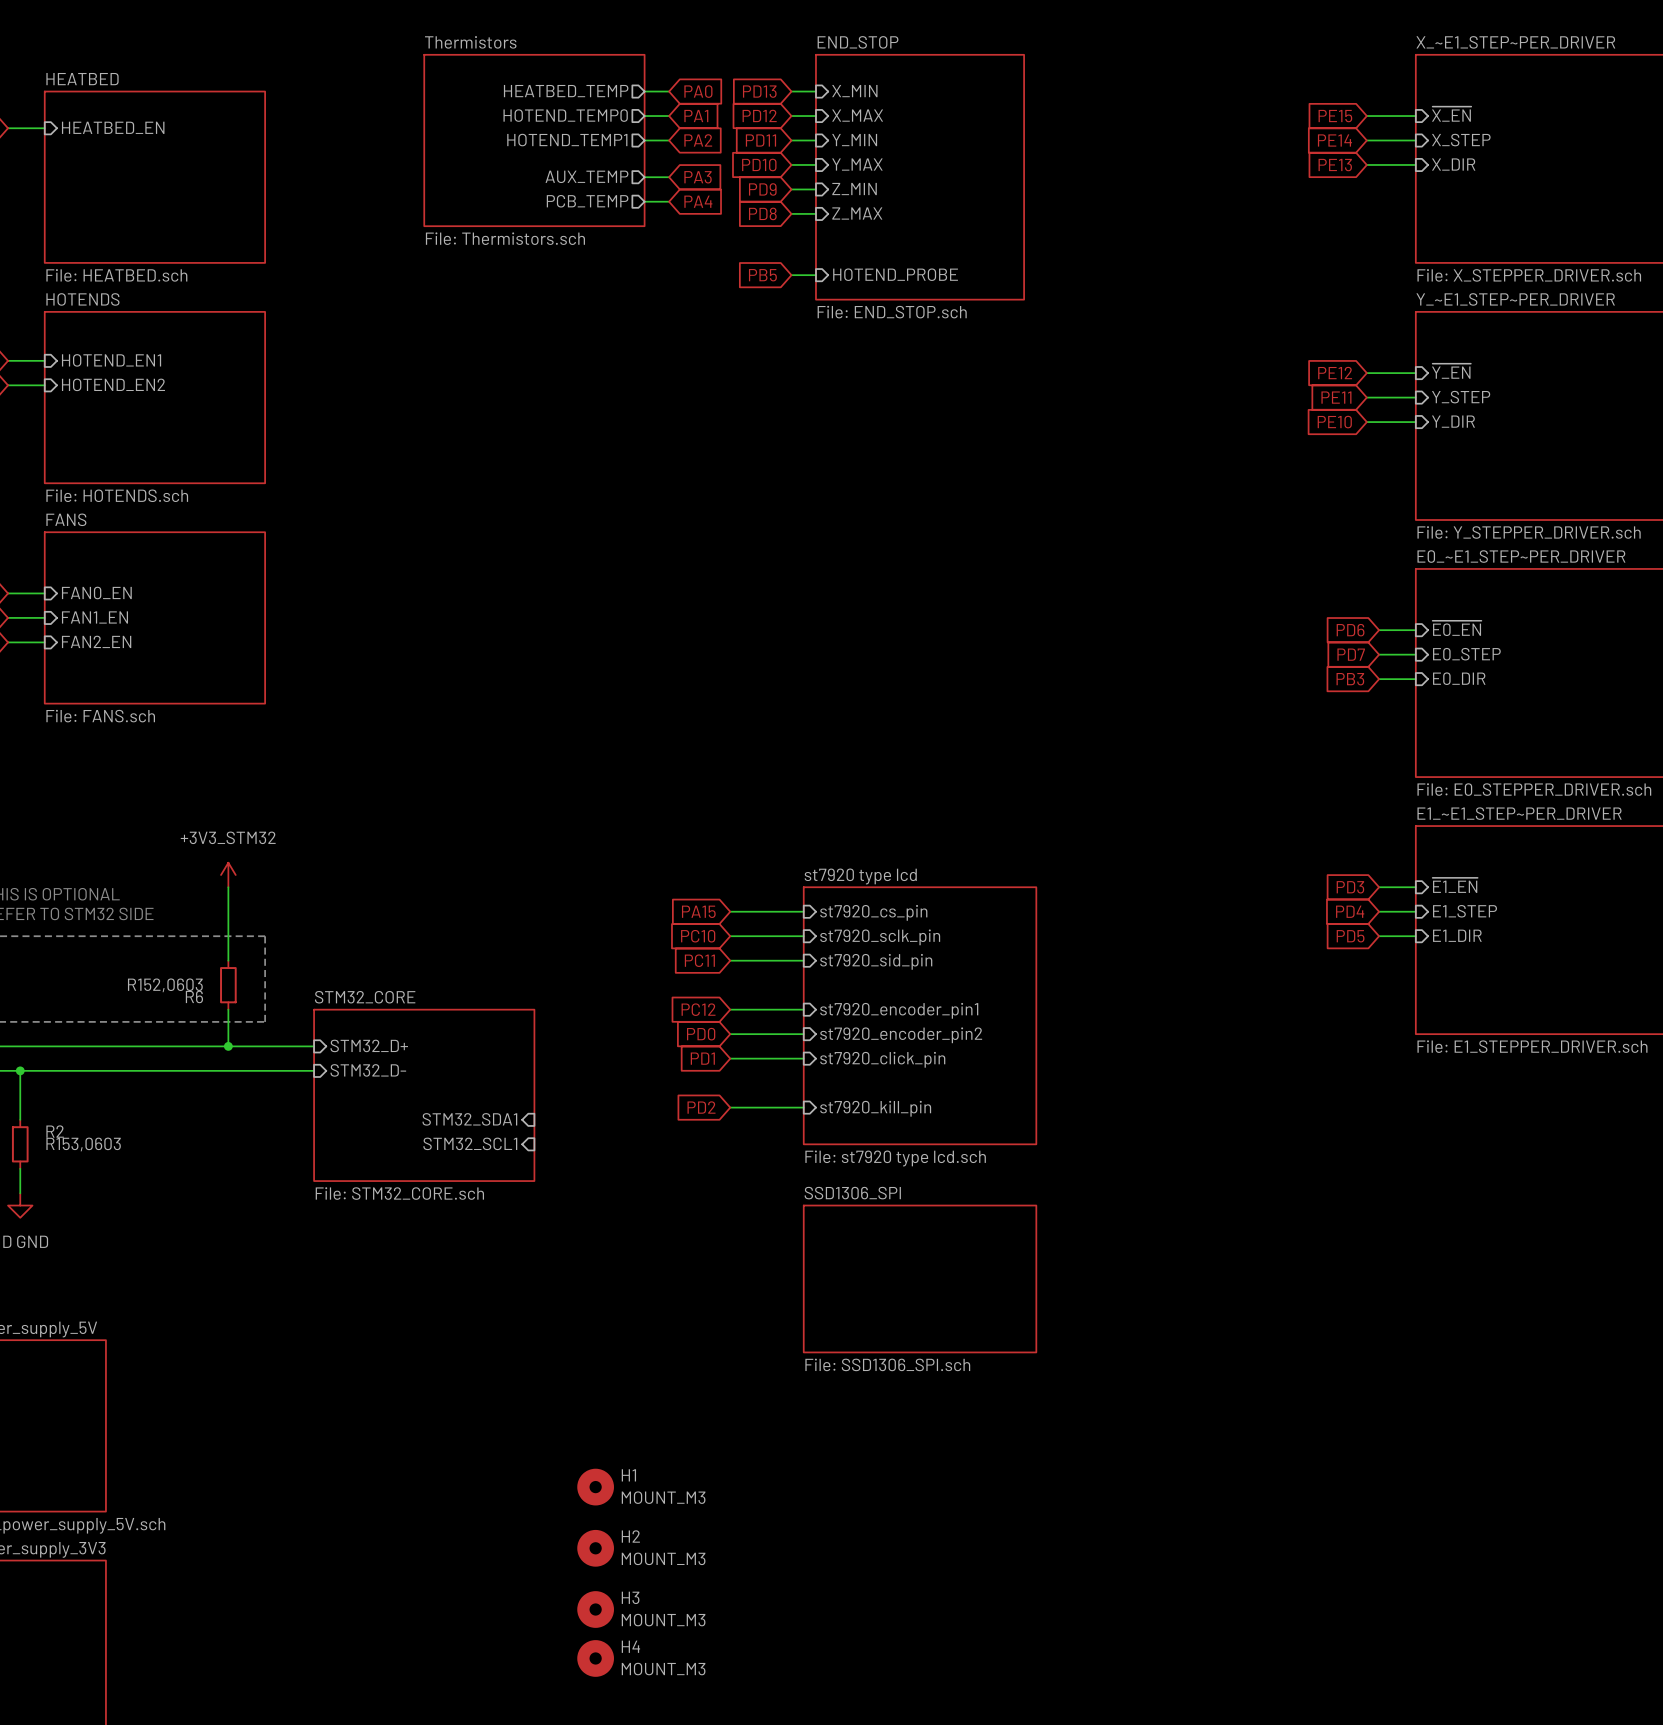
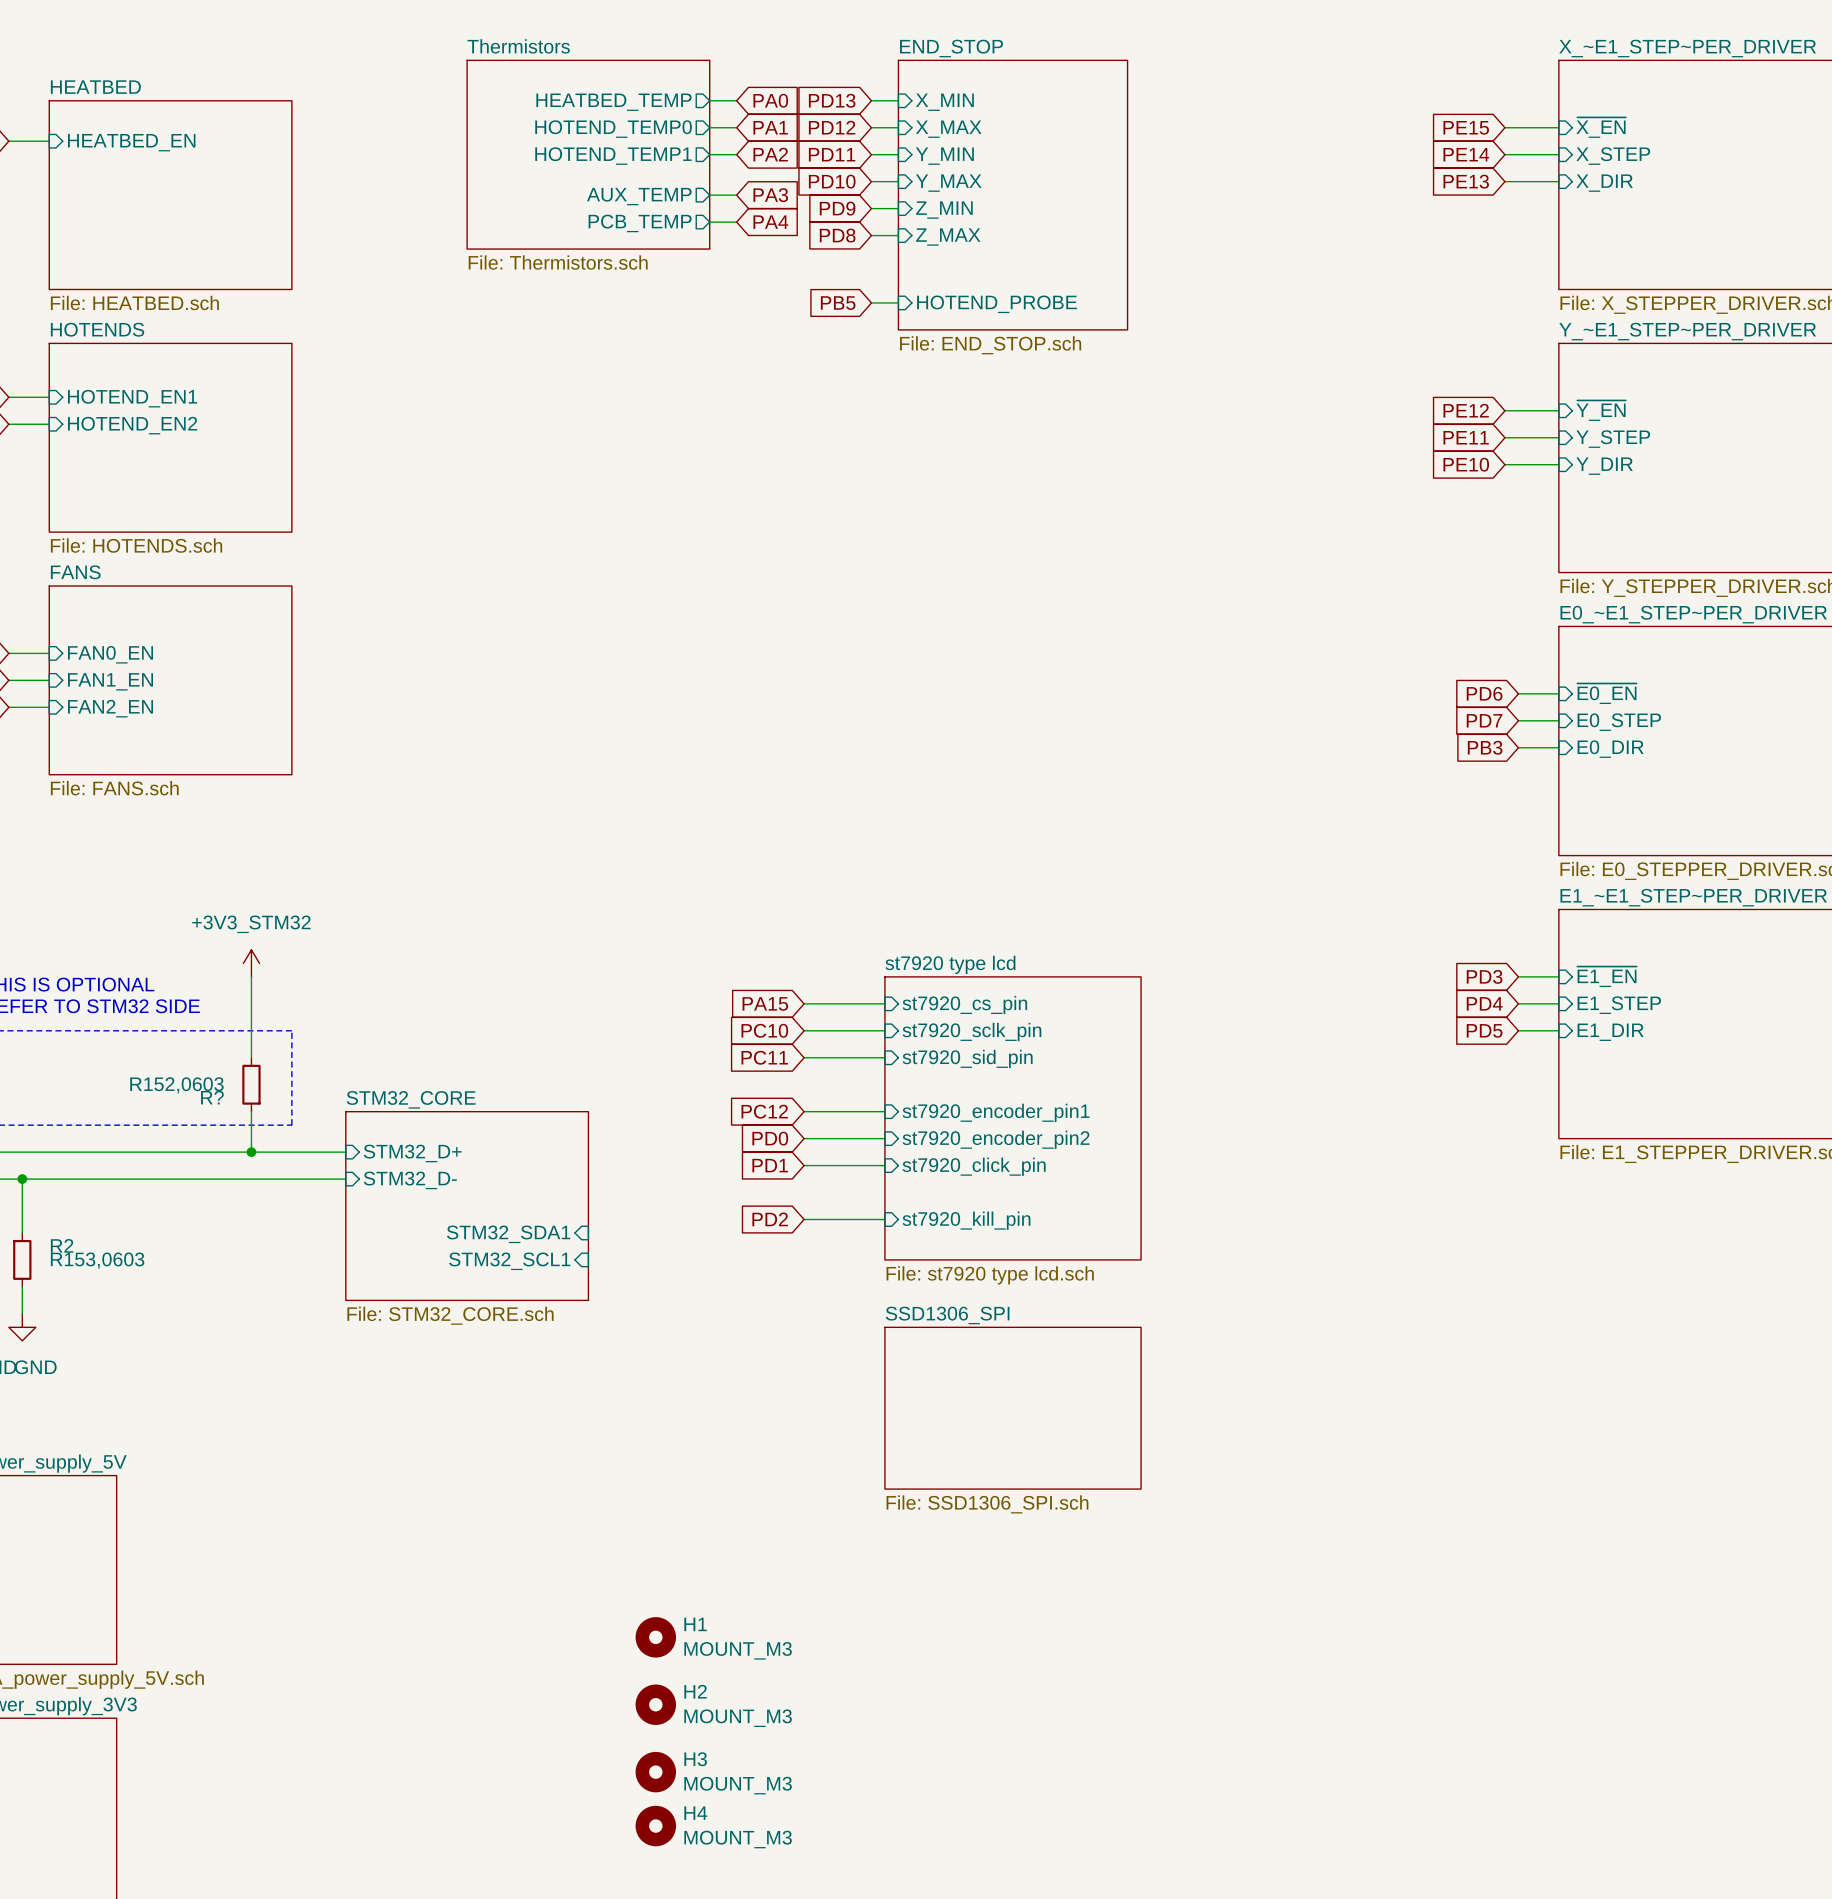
R6 name: R6 (194, 996) -> R? (212, 1097)

